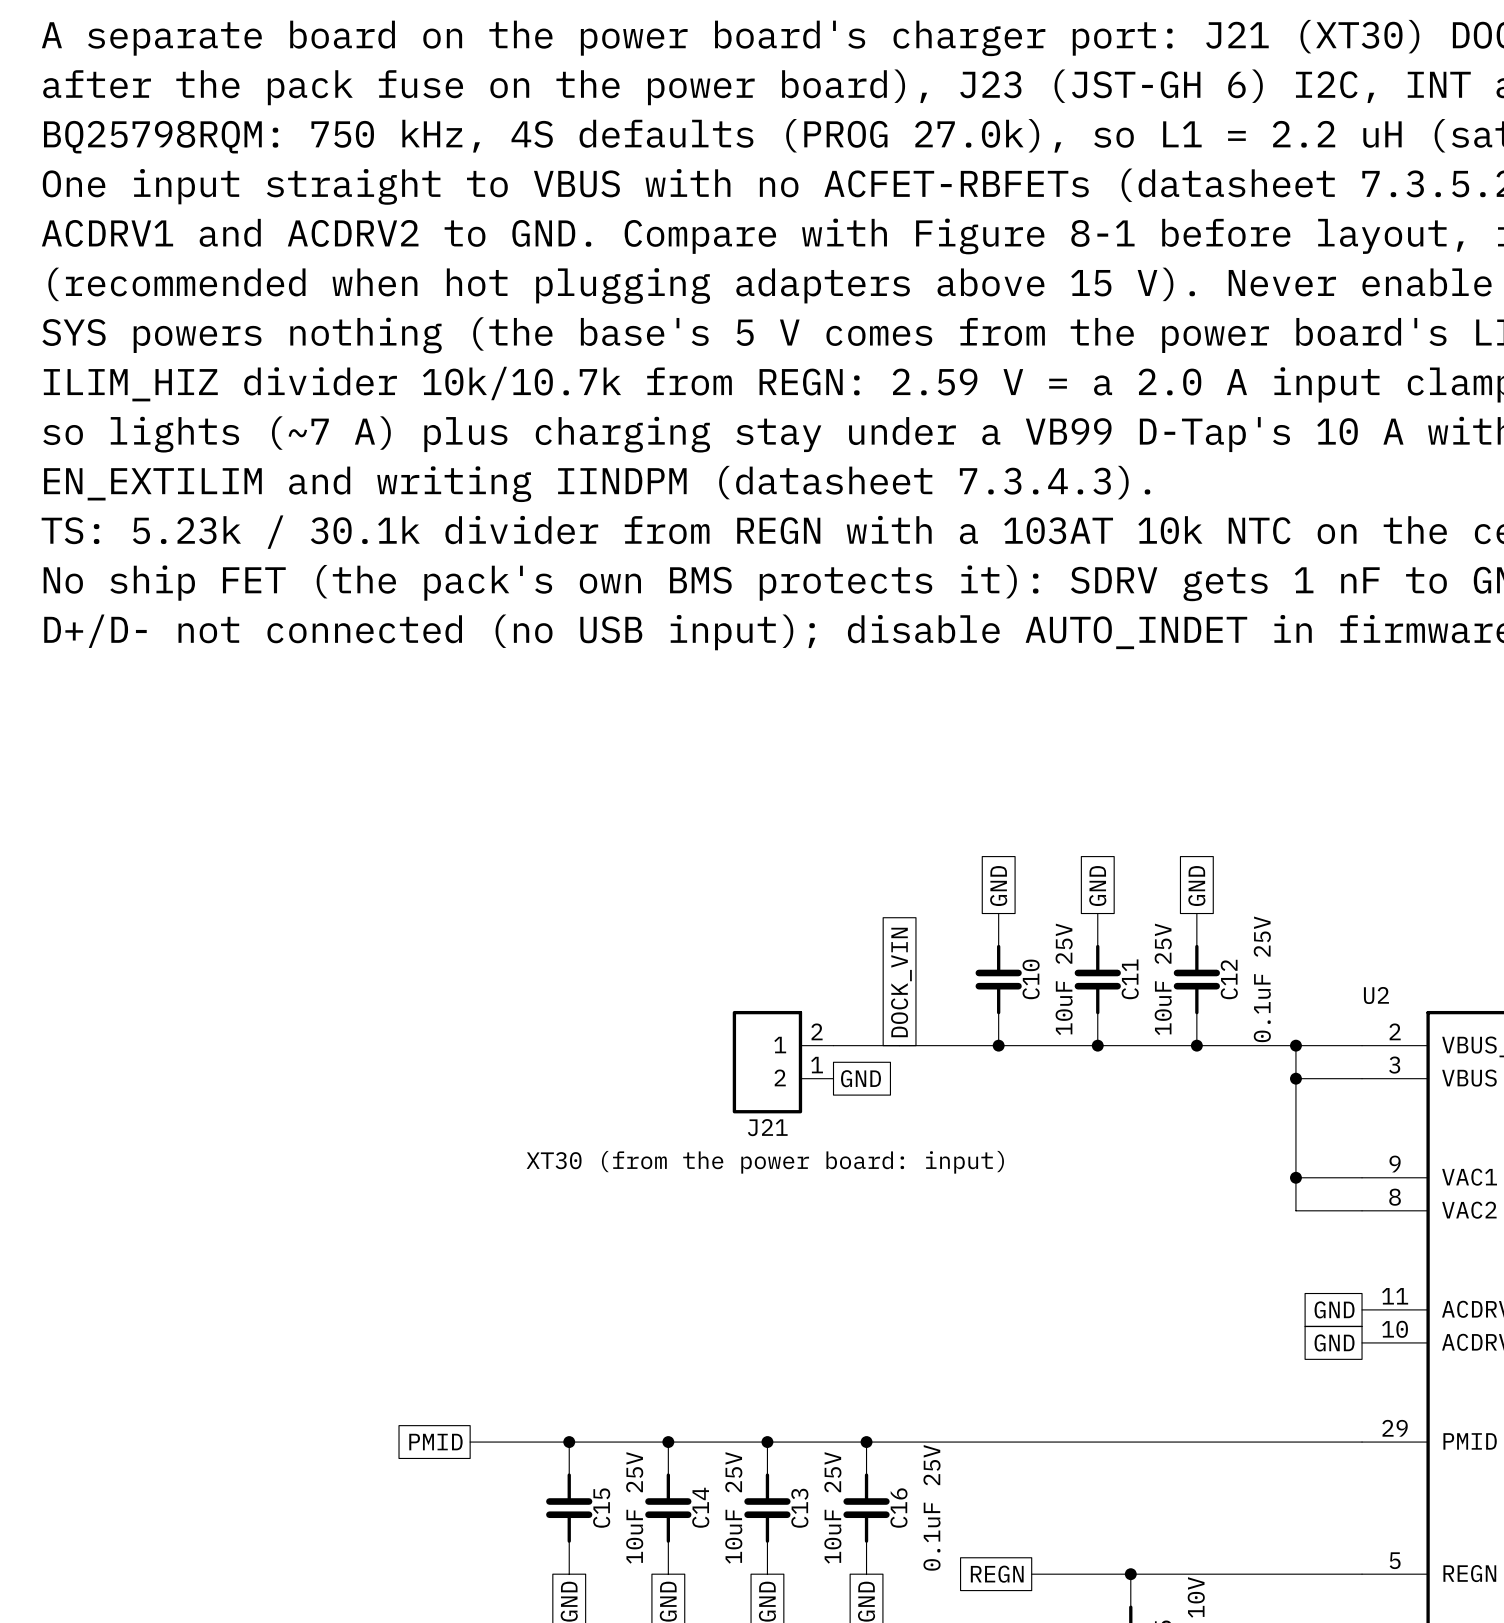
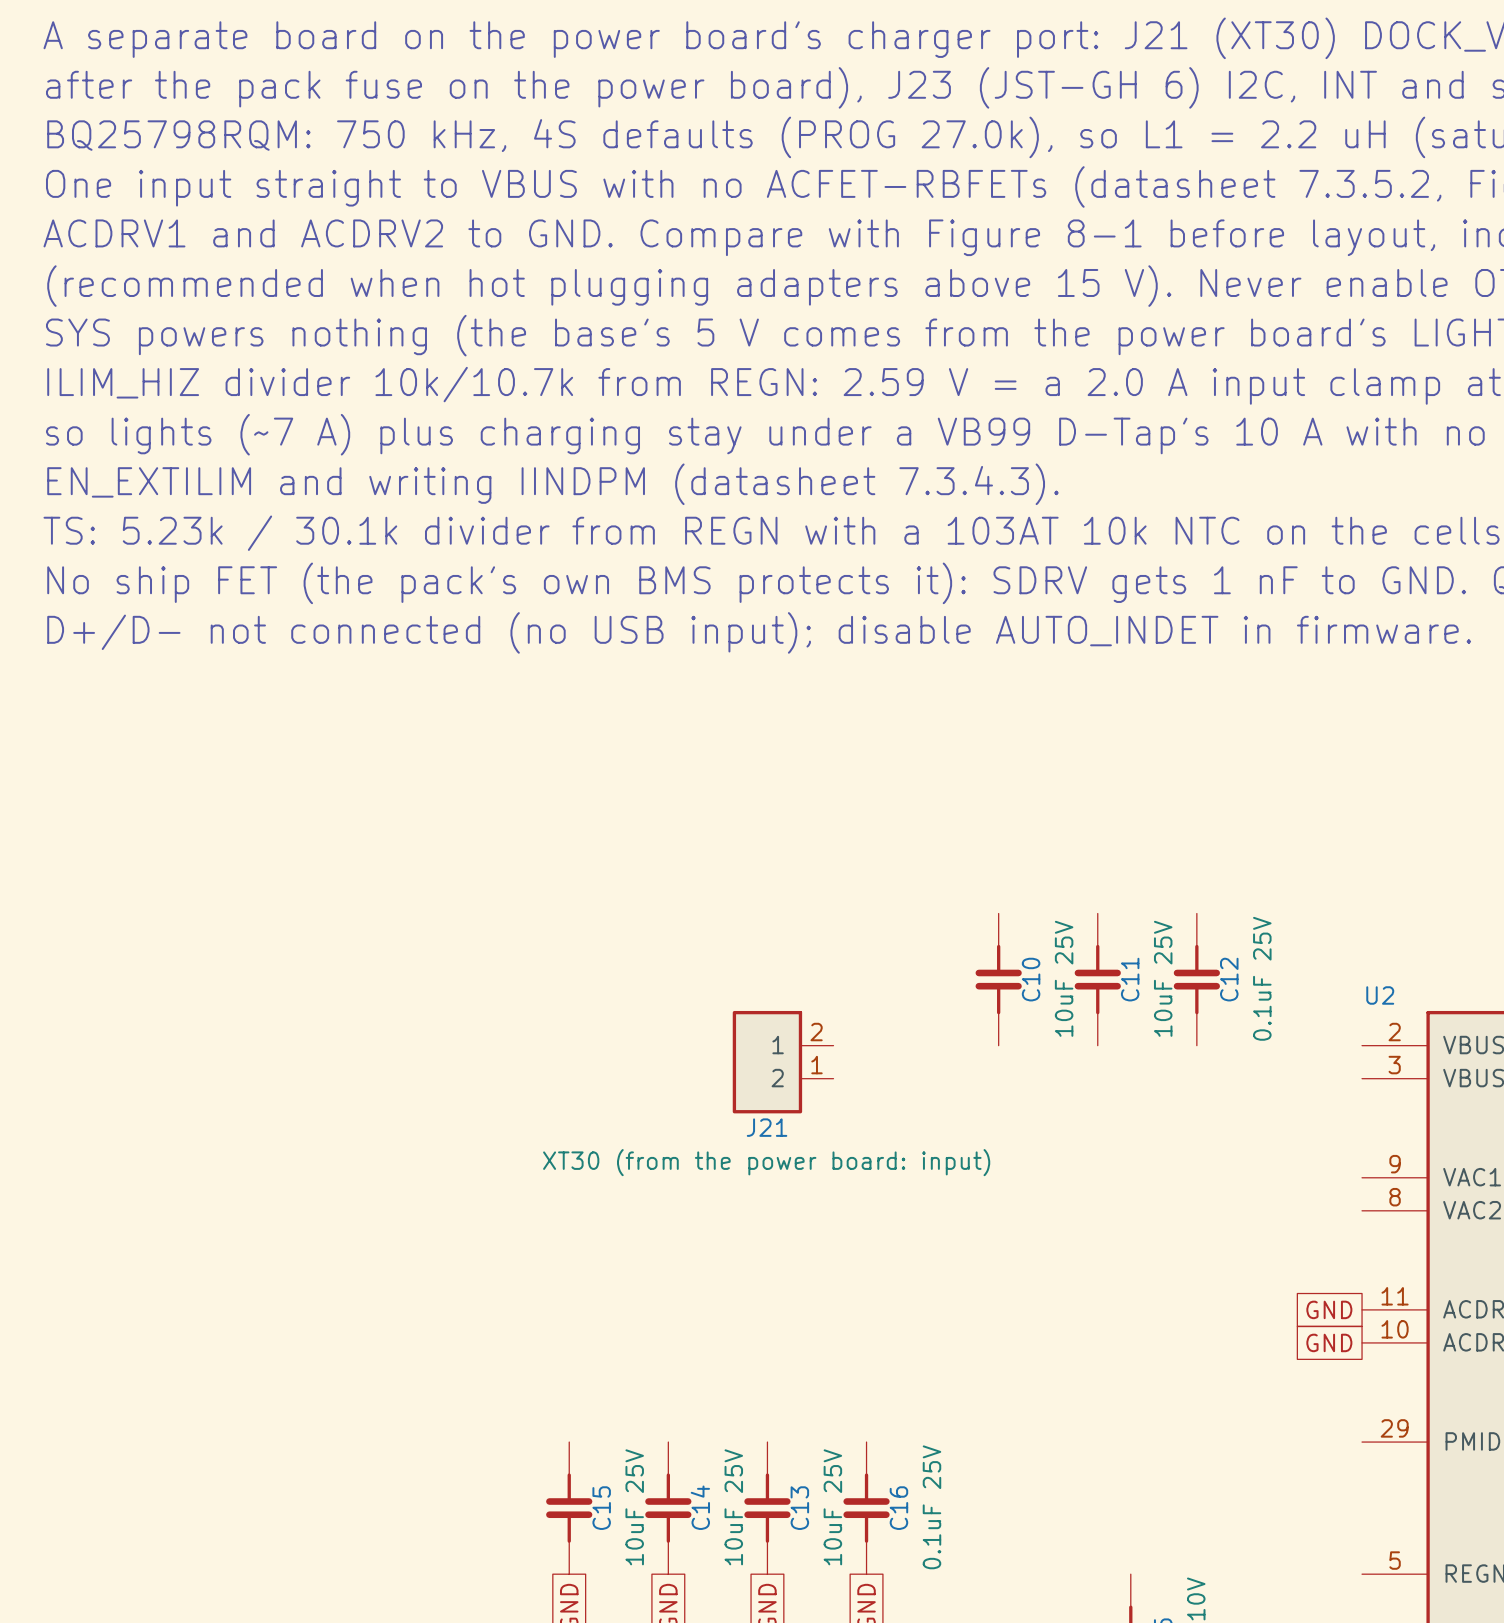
global label: GND (998, 886) -> none
global label: GND (1097, 886) -> none
global label: GND (1196, 886) -> none
global label: DOCK_VIN (901, 982) -> none
wire: (833, 1045) (1362, 1045) -> none
junction: (998, 1045) -> none
junction: (1097, 1045) -> none
junction: (1196, 1045) -> none
wire: (1295, 1045) (1295, 1210) (1362, 1210) -> none
junction: (1295, 1045) -> none
global label: GND (860, 1078) -> none
wire: (1295, 1078) (1362, 1078) -> none
junction: (1295, 1078) -> none
wire: (1295, 1177) (1362, 1177) -> none
junction: (1295, 1177) -> none
global label: PMID (435, 1442) -> none
wire: (470, 1442) (1362, 1442) -> none
junction: (569, 1442) -> none
junction: (668, 1442) -> none
junction: (767, 1442) -> none
junction: (866, 1442) -> none
global label: REGN (997, 1574) -> none
wire: (1031, 1574) (1362, 1574) -> none
junction: (1130, 1574) -> none

